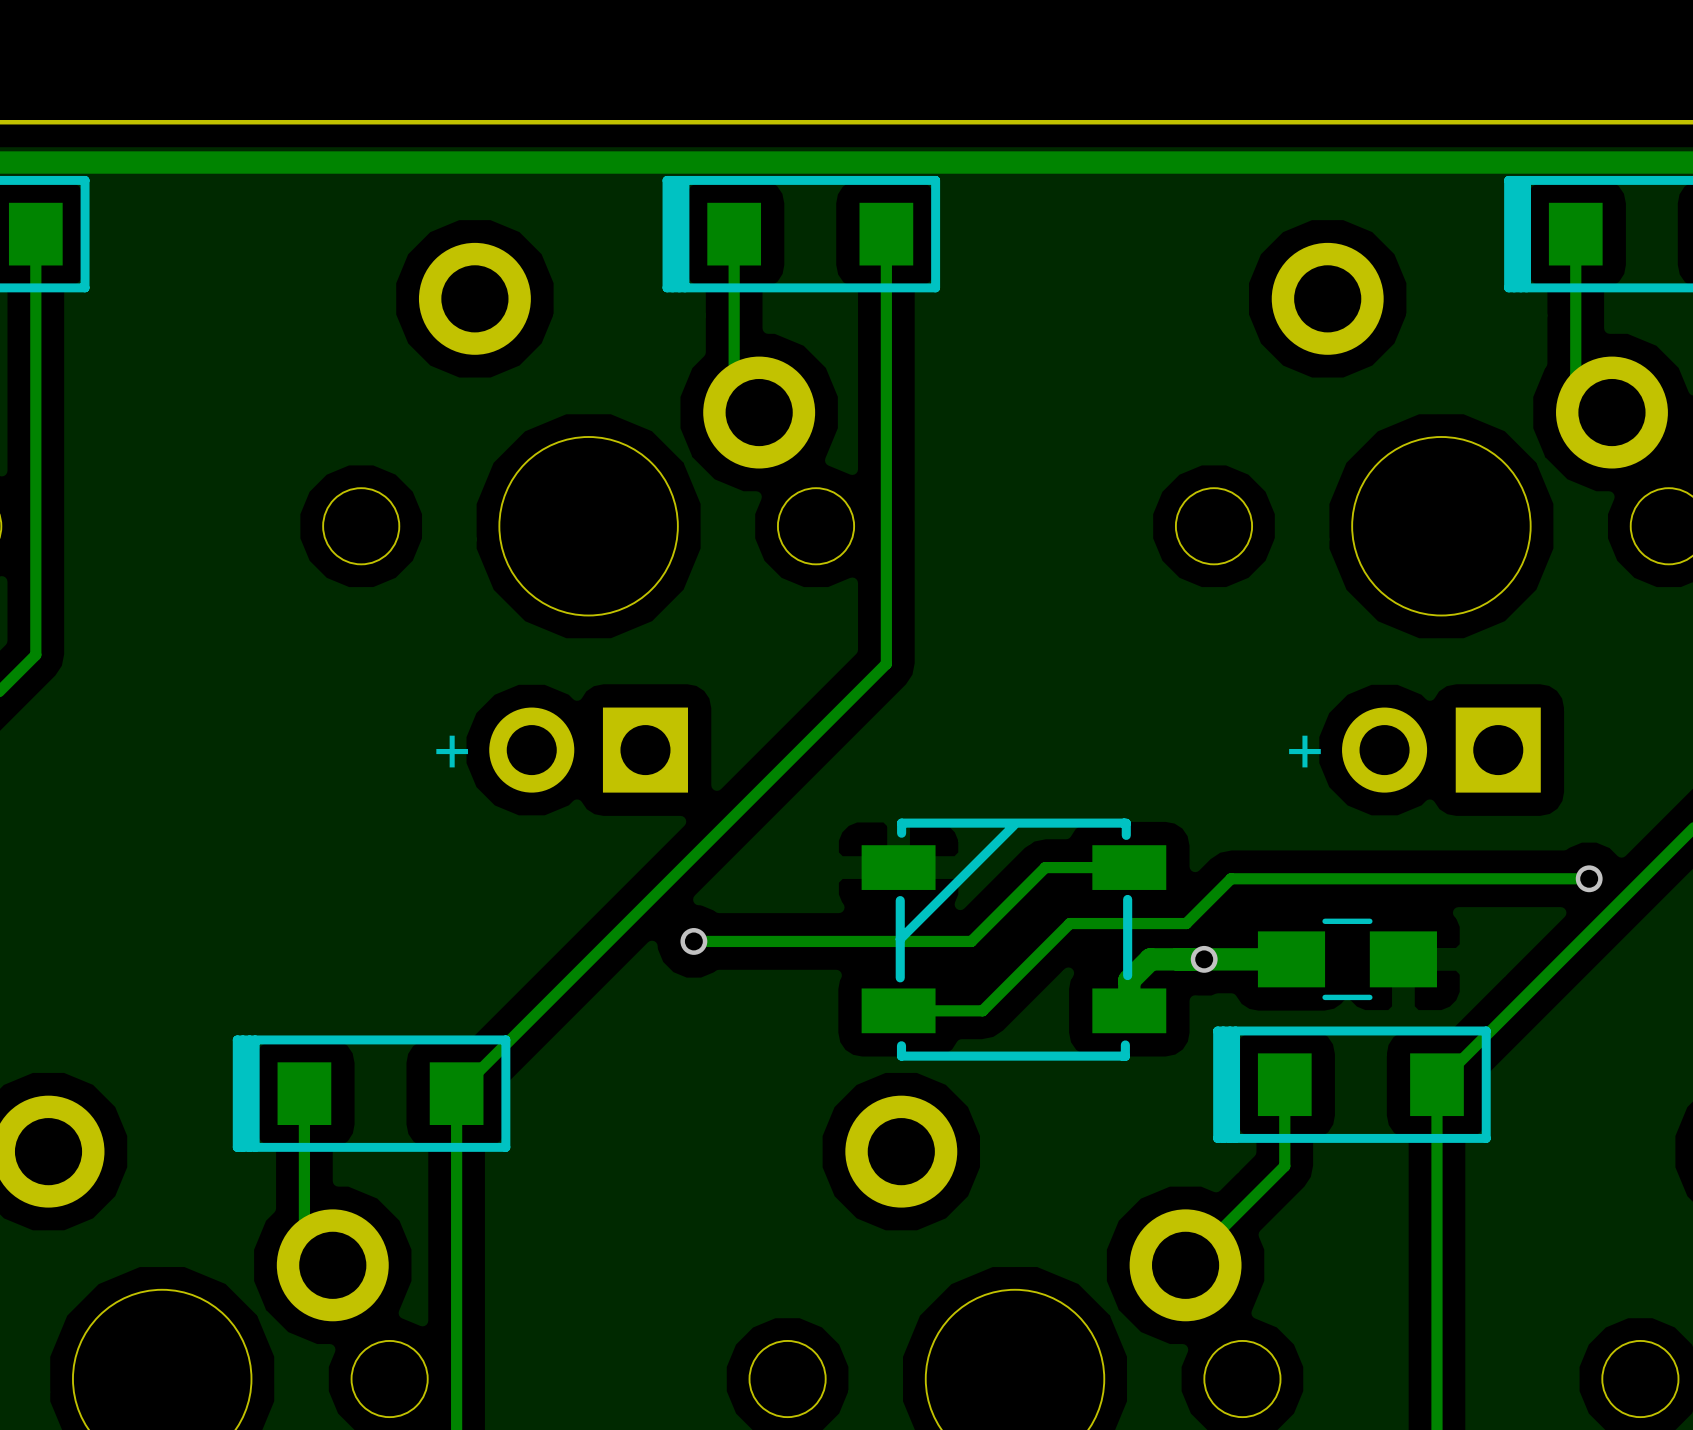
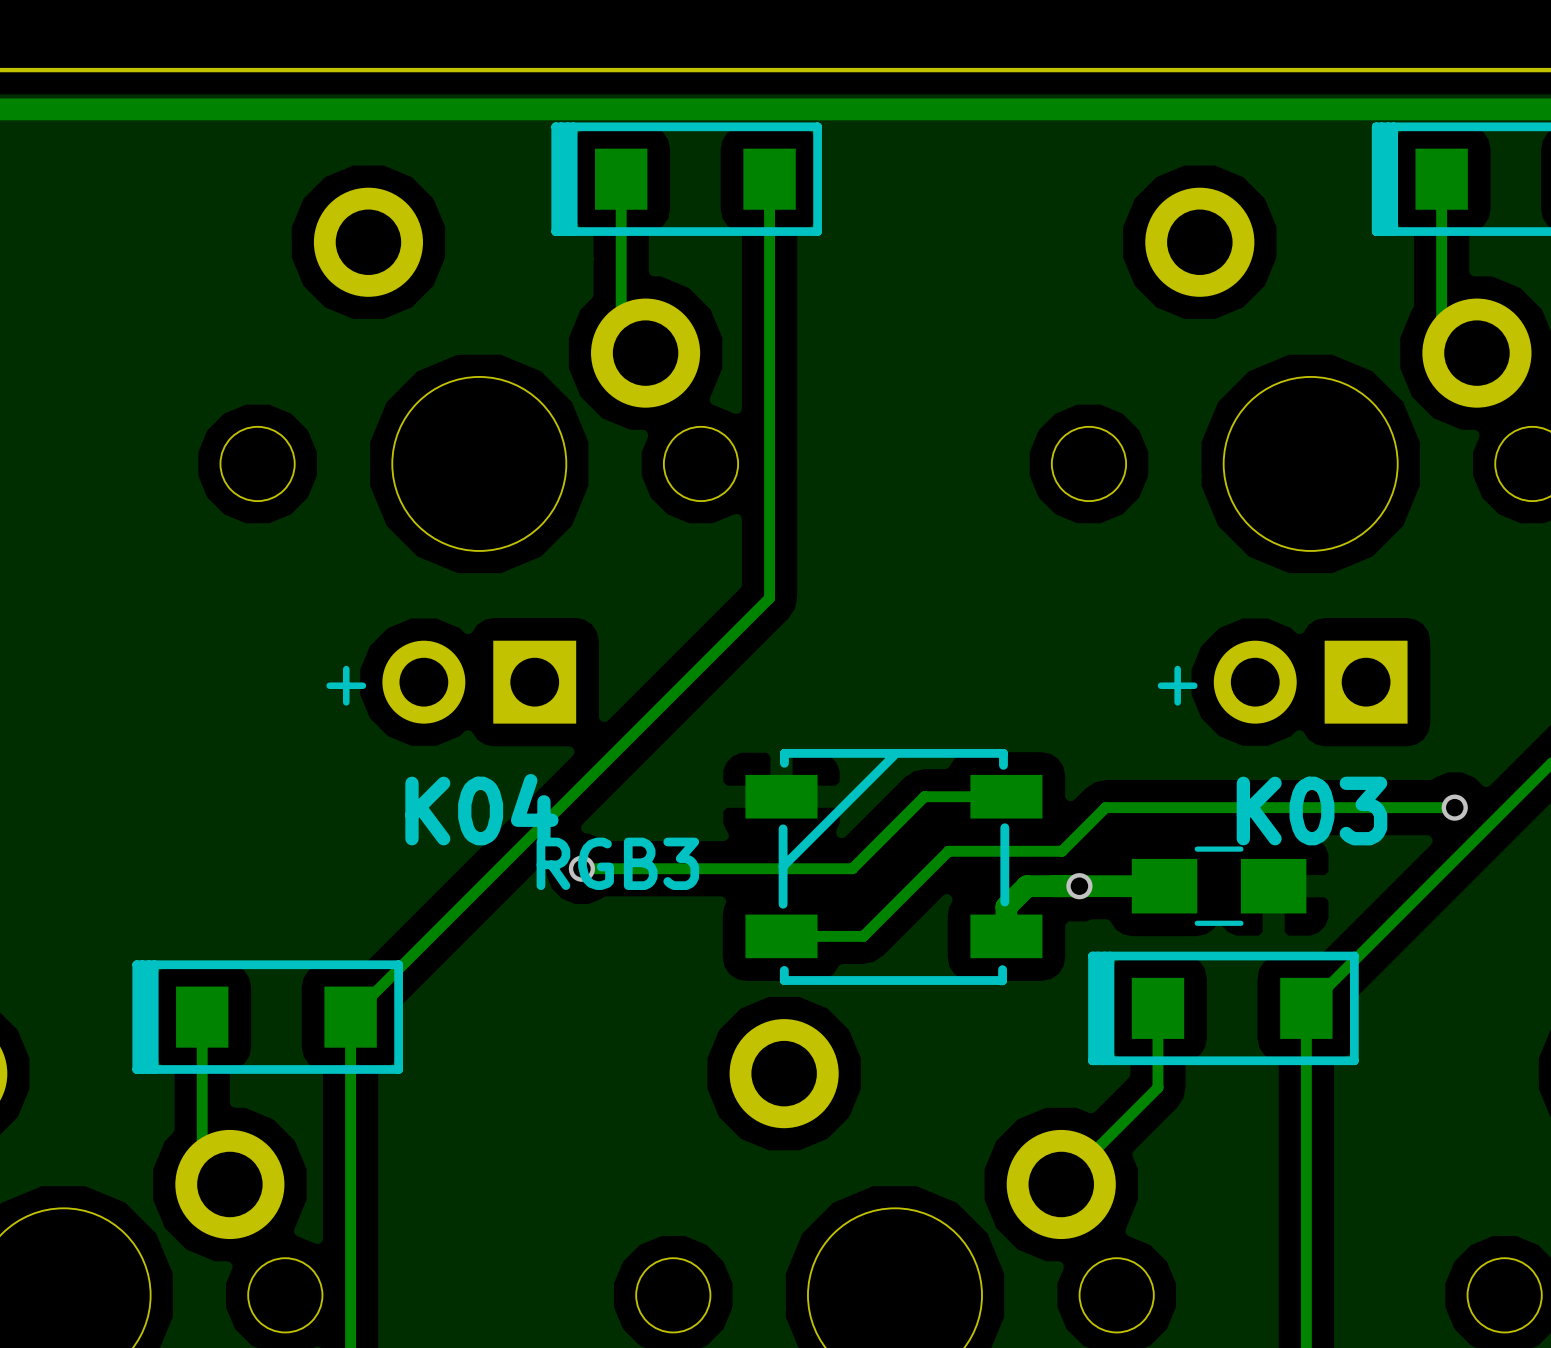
part value: none -> K04 (481, 809)
part value: none -> K03 (1312, 811)
RGB3 name: none -> RGB3 (617, 863)

